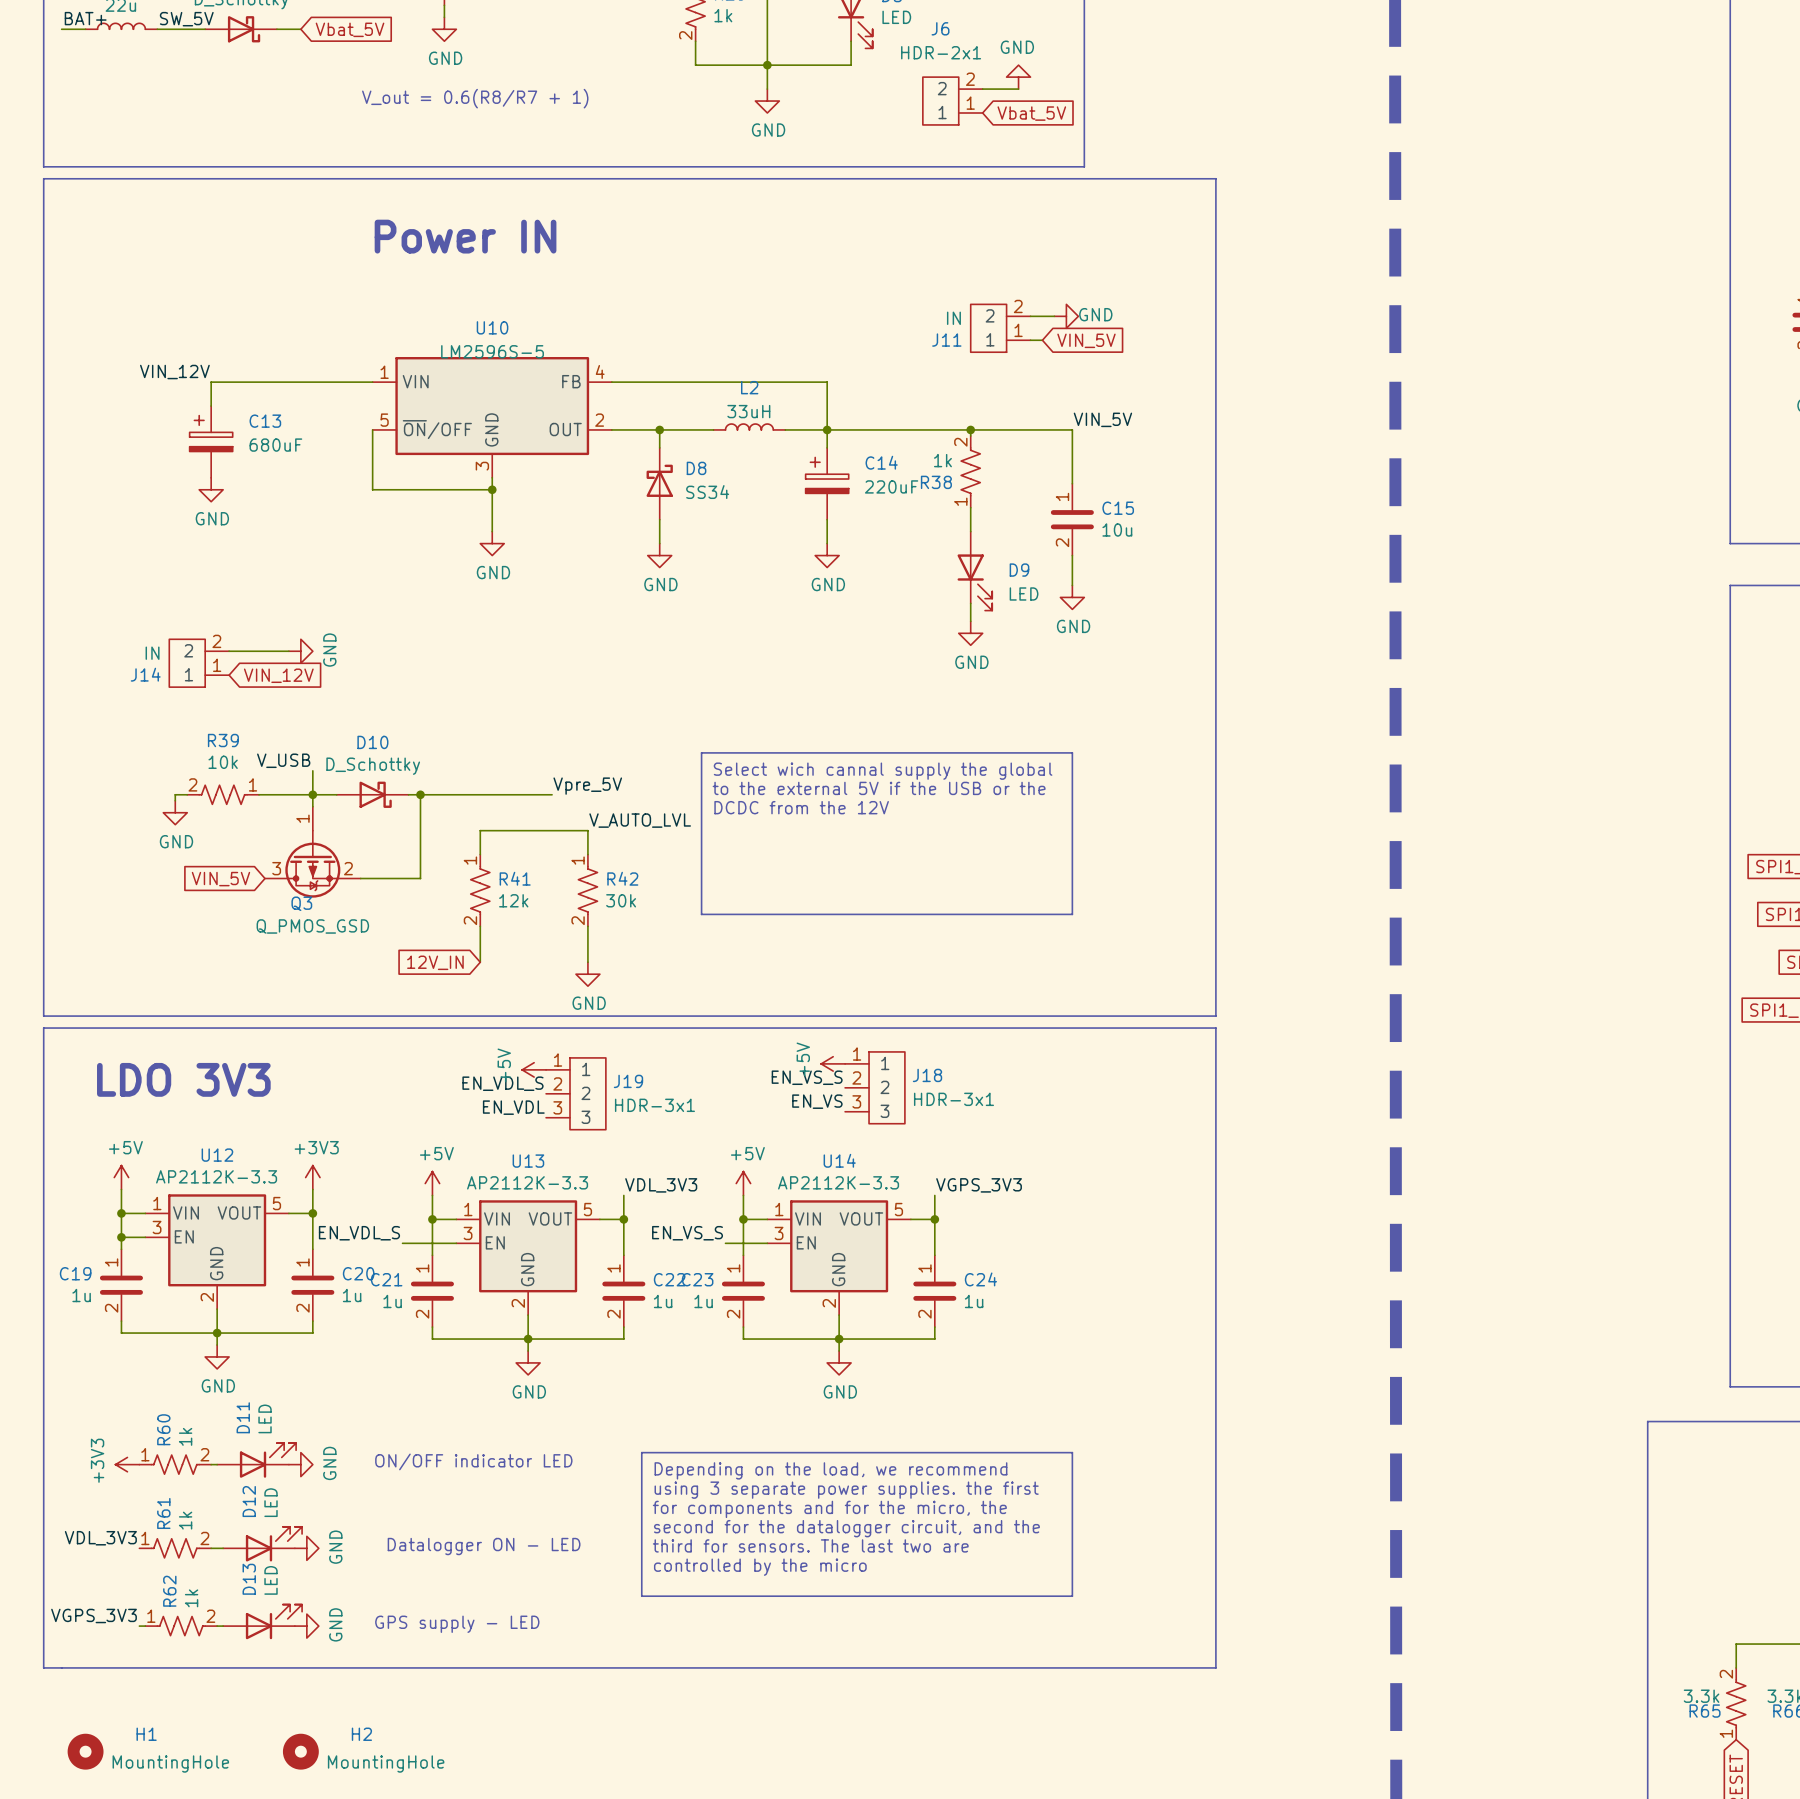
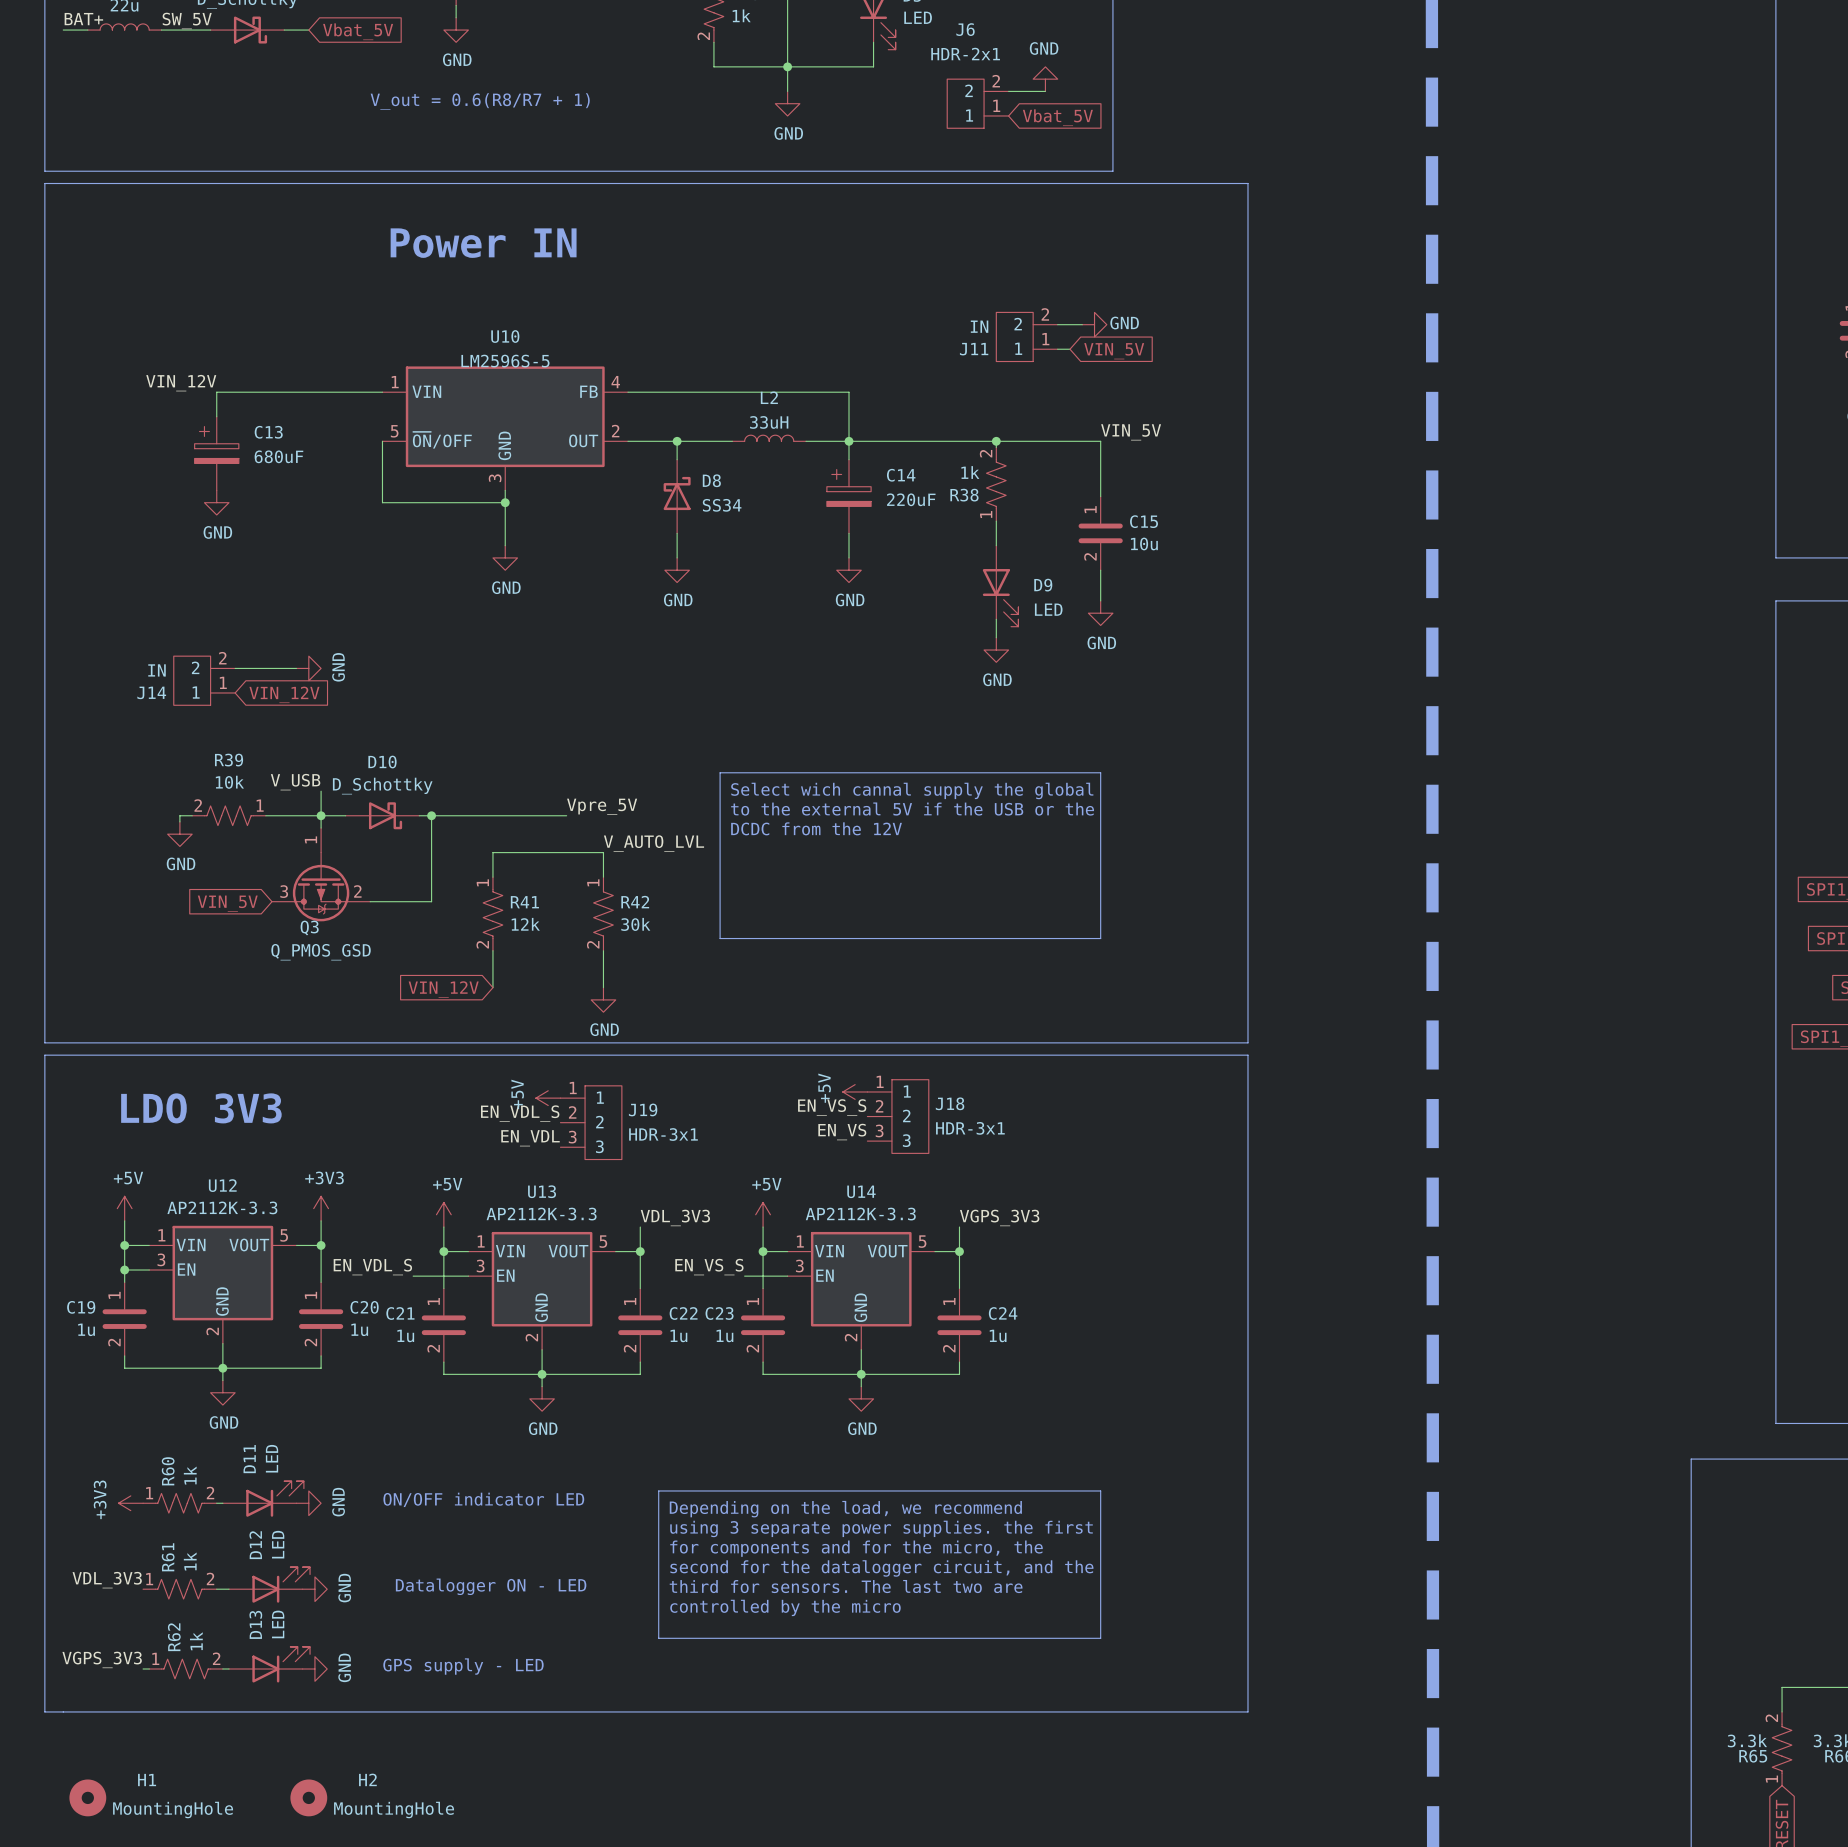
global label: 12V_IN (435, 962) -> VIN_12V (443, 989)

